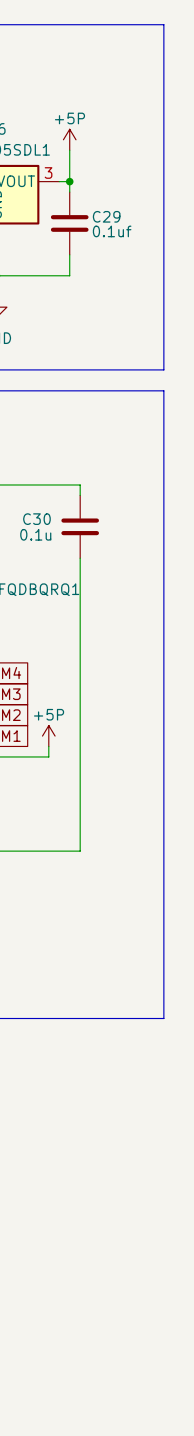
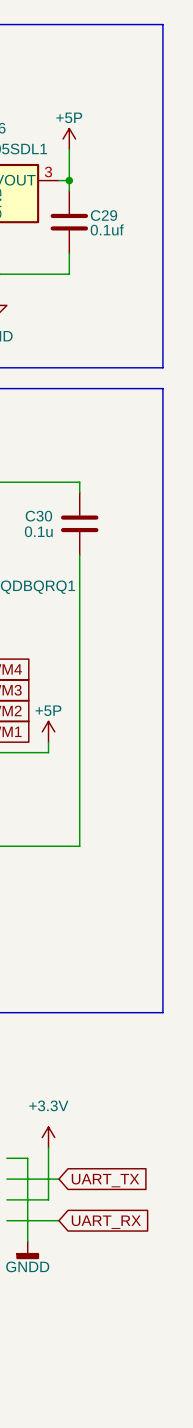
power symbol: none -> +3.3V (48, 1137)
wire: none -> (48, 1147) (48, 1199) (6, 1199)
wire: none -> (6, 1158) (27, 1158) (27, 1241)
wire: none -> (6, 1179) (58, 1179)
global label: none -> UART_TX (105, 1180)
wire: none -> (6, 1220) (58, 1220)
global label: none -> UART_RX (106, 1222)
power symbol: none -> GNDD (27, 1250)

